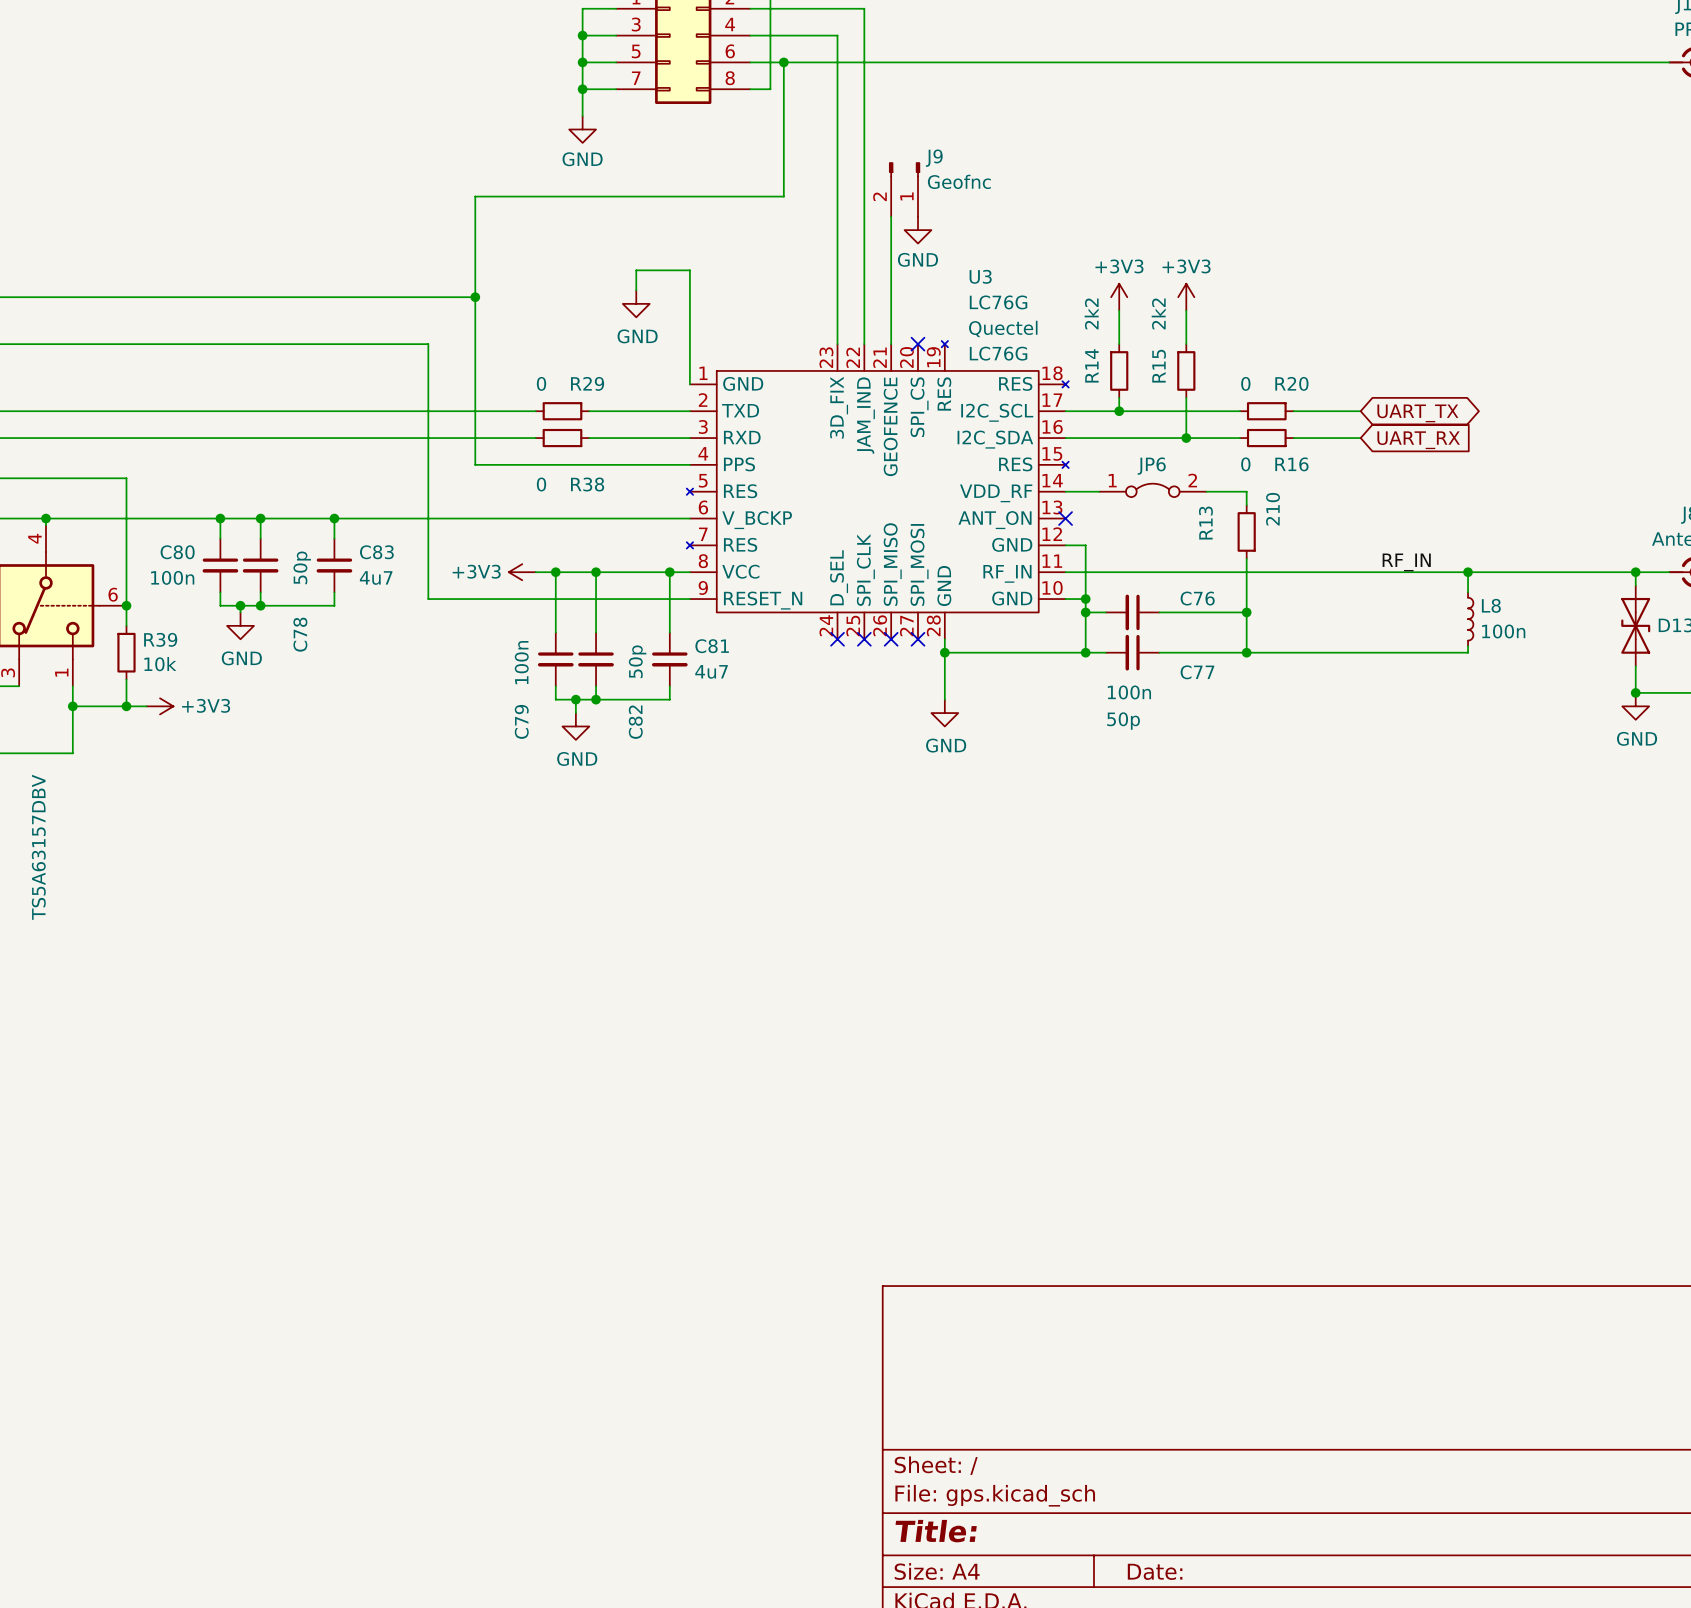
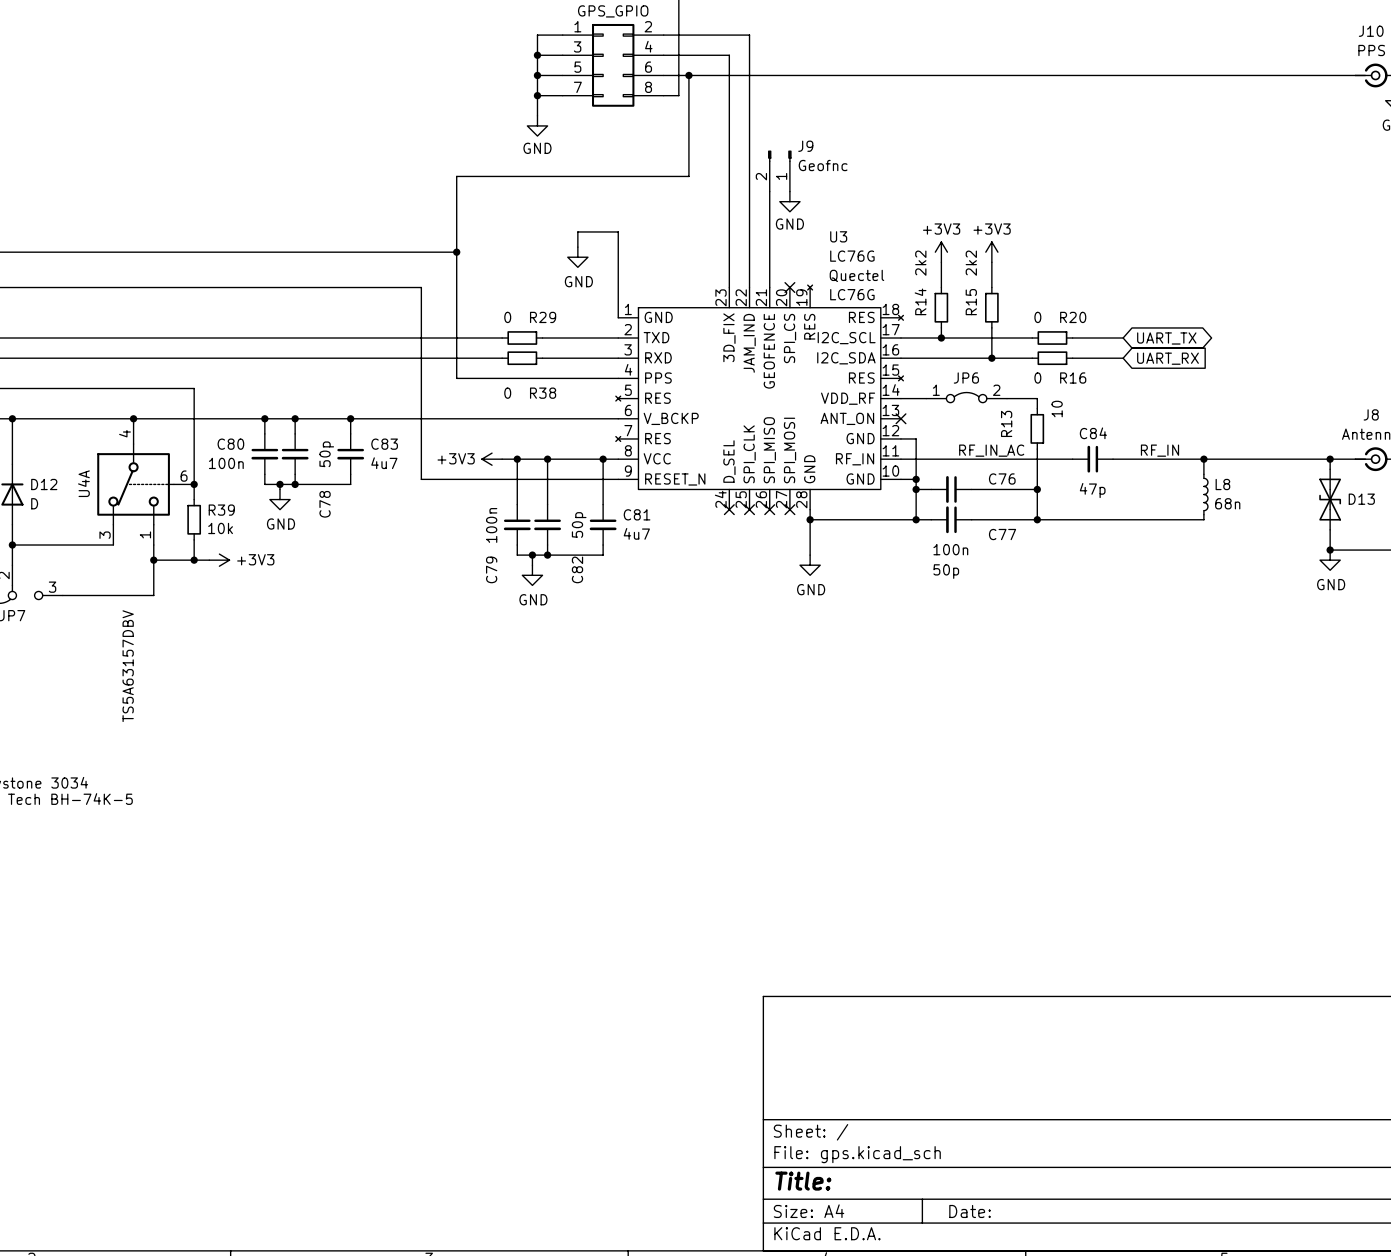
R13 value: 210 (1273, 509) -> 10 (1057, 409)
label: none -> RF_IN_AC (991, 450)
C84: none -> 47p (1092, 459)
L8 value: 100n (1503, 631) -> 68n (1227, 503)

